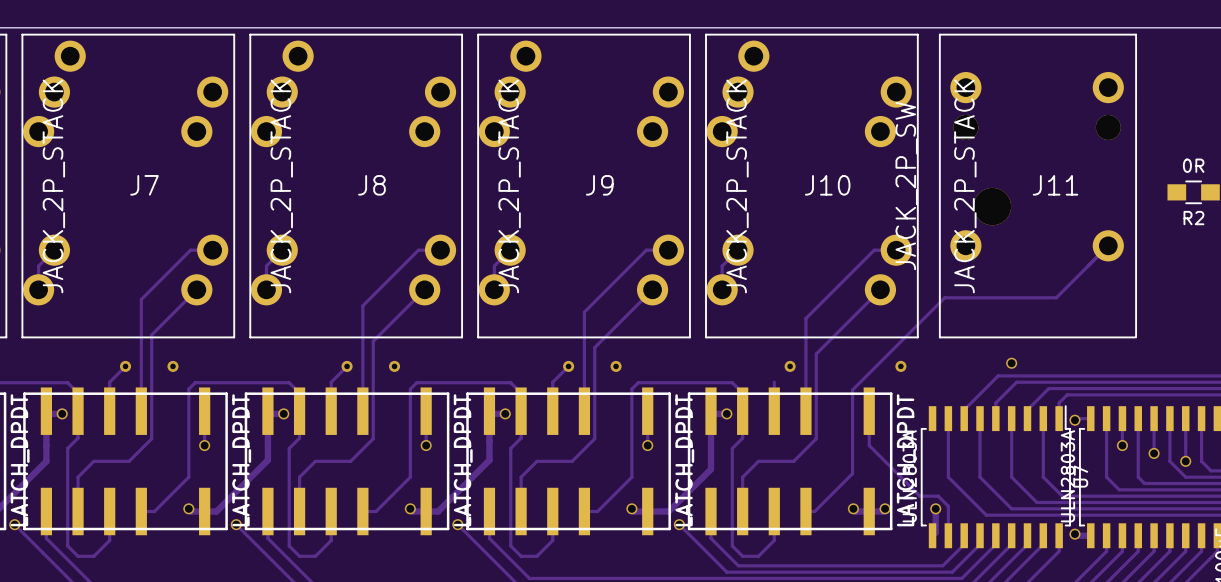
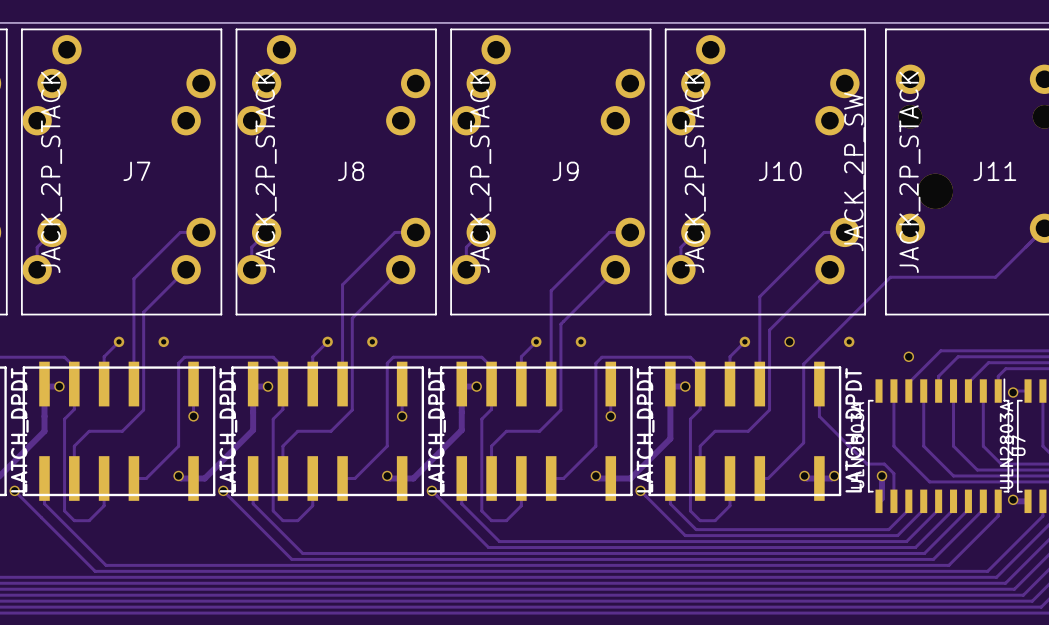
via position: (1011, 363) -> (908, 356)
track: none -> (744, 341) (730, 356)
via: none -> (789, 341)

